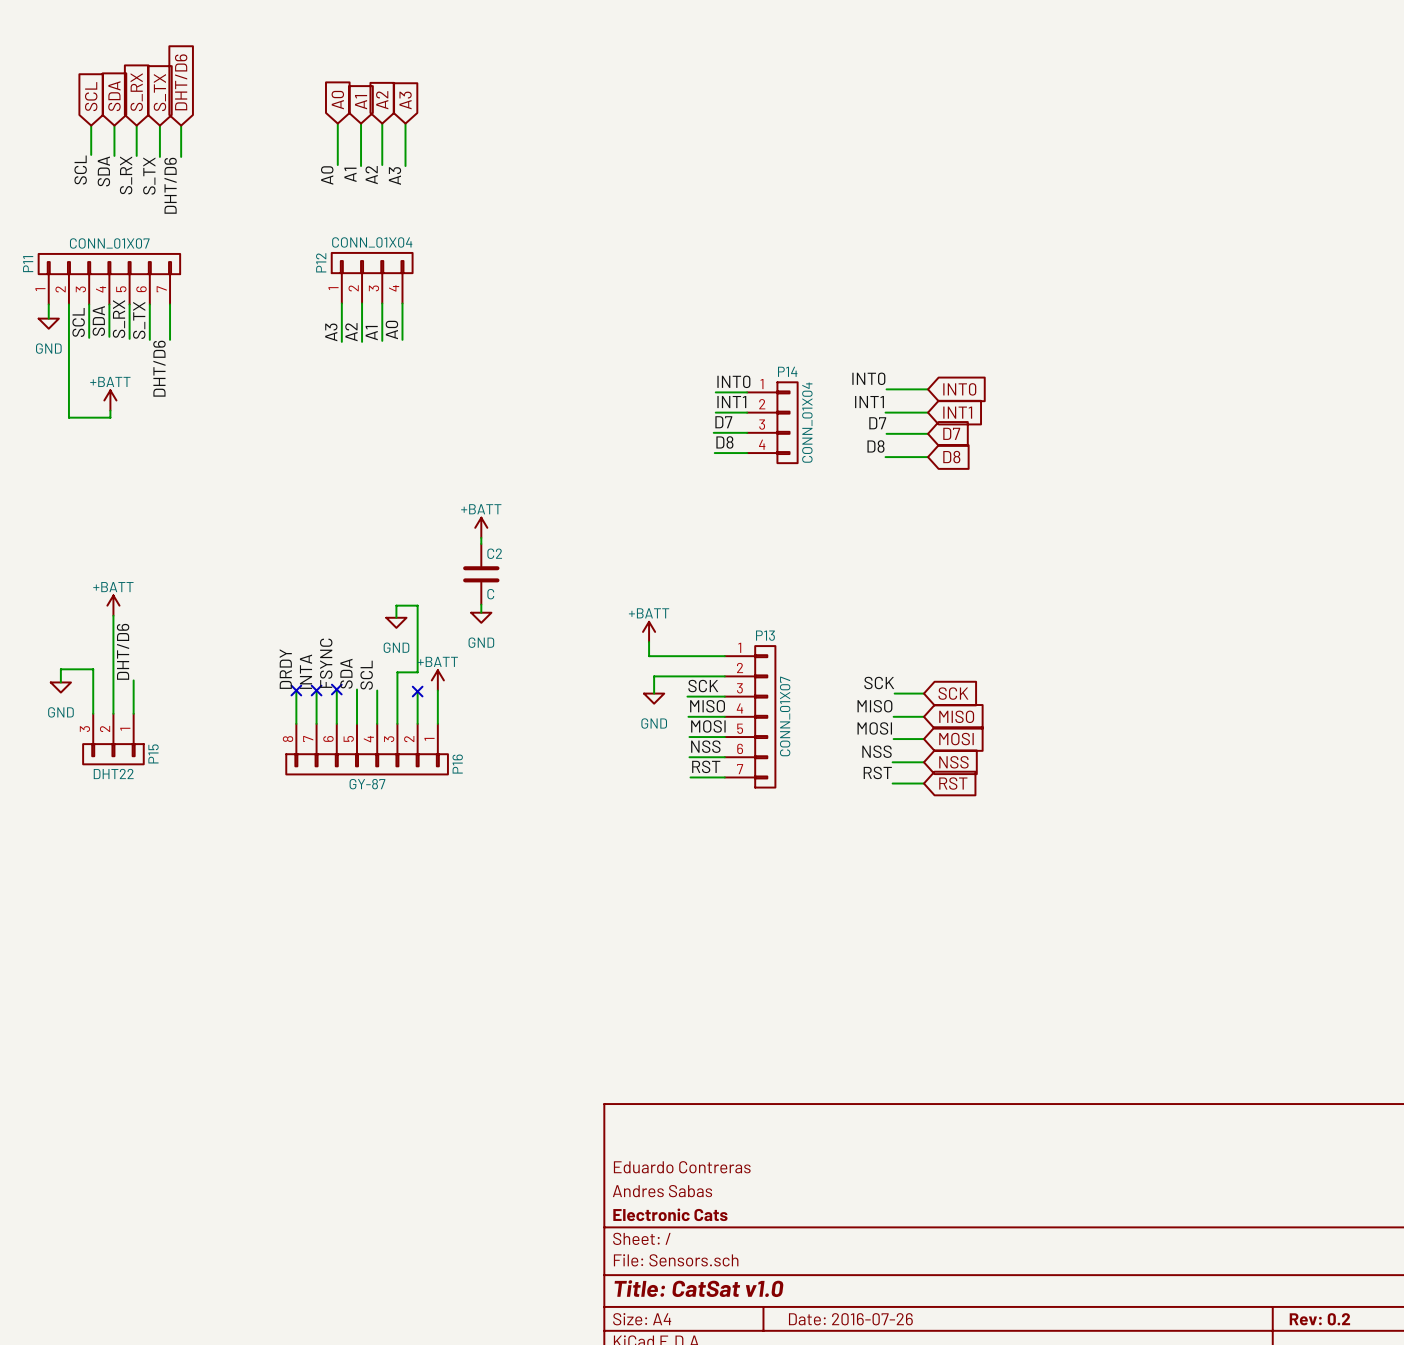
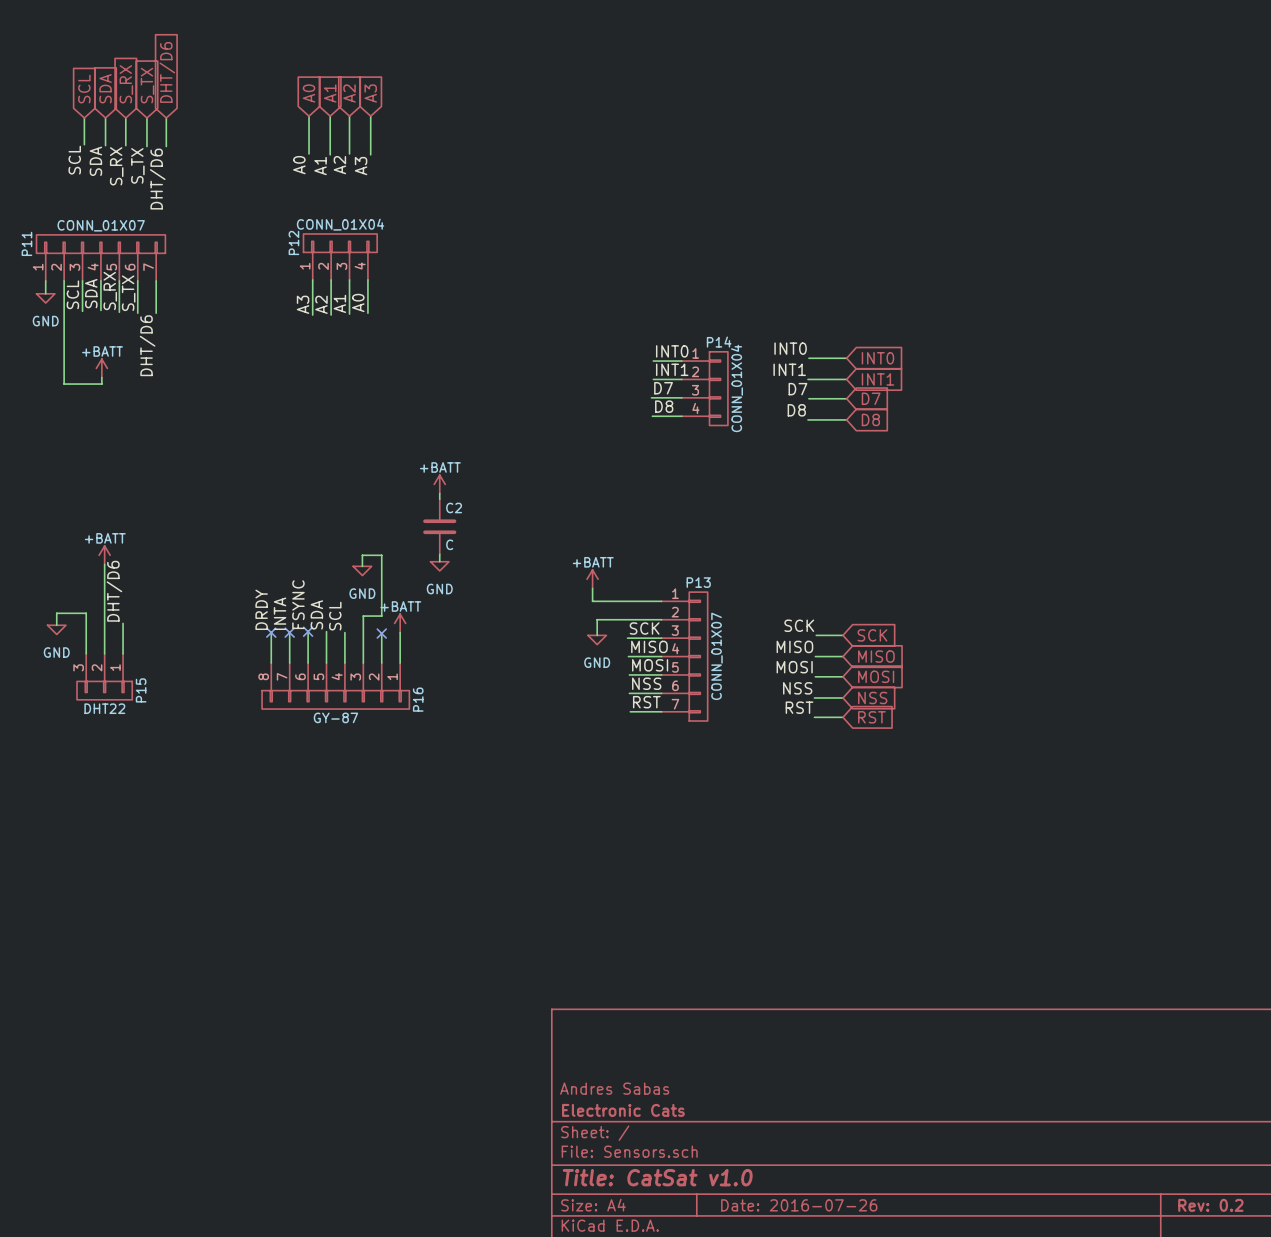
title block: Eduardo Contreras (682, 1167) -> none

